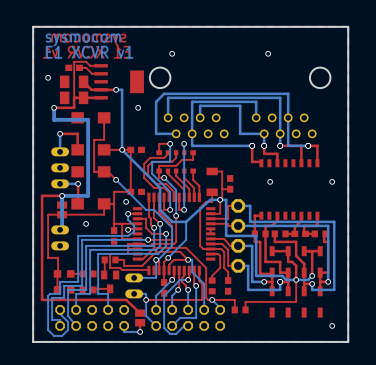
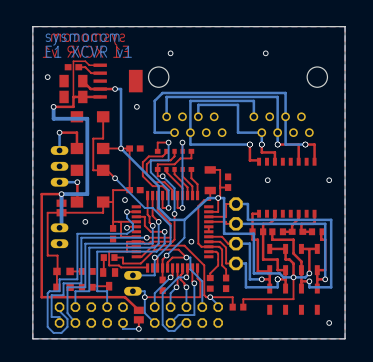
via: none -> (191, 241)

